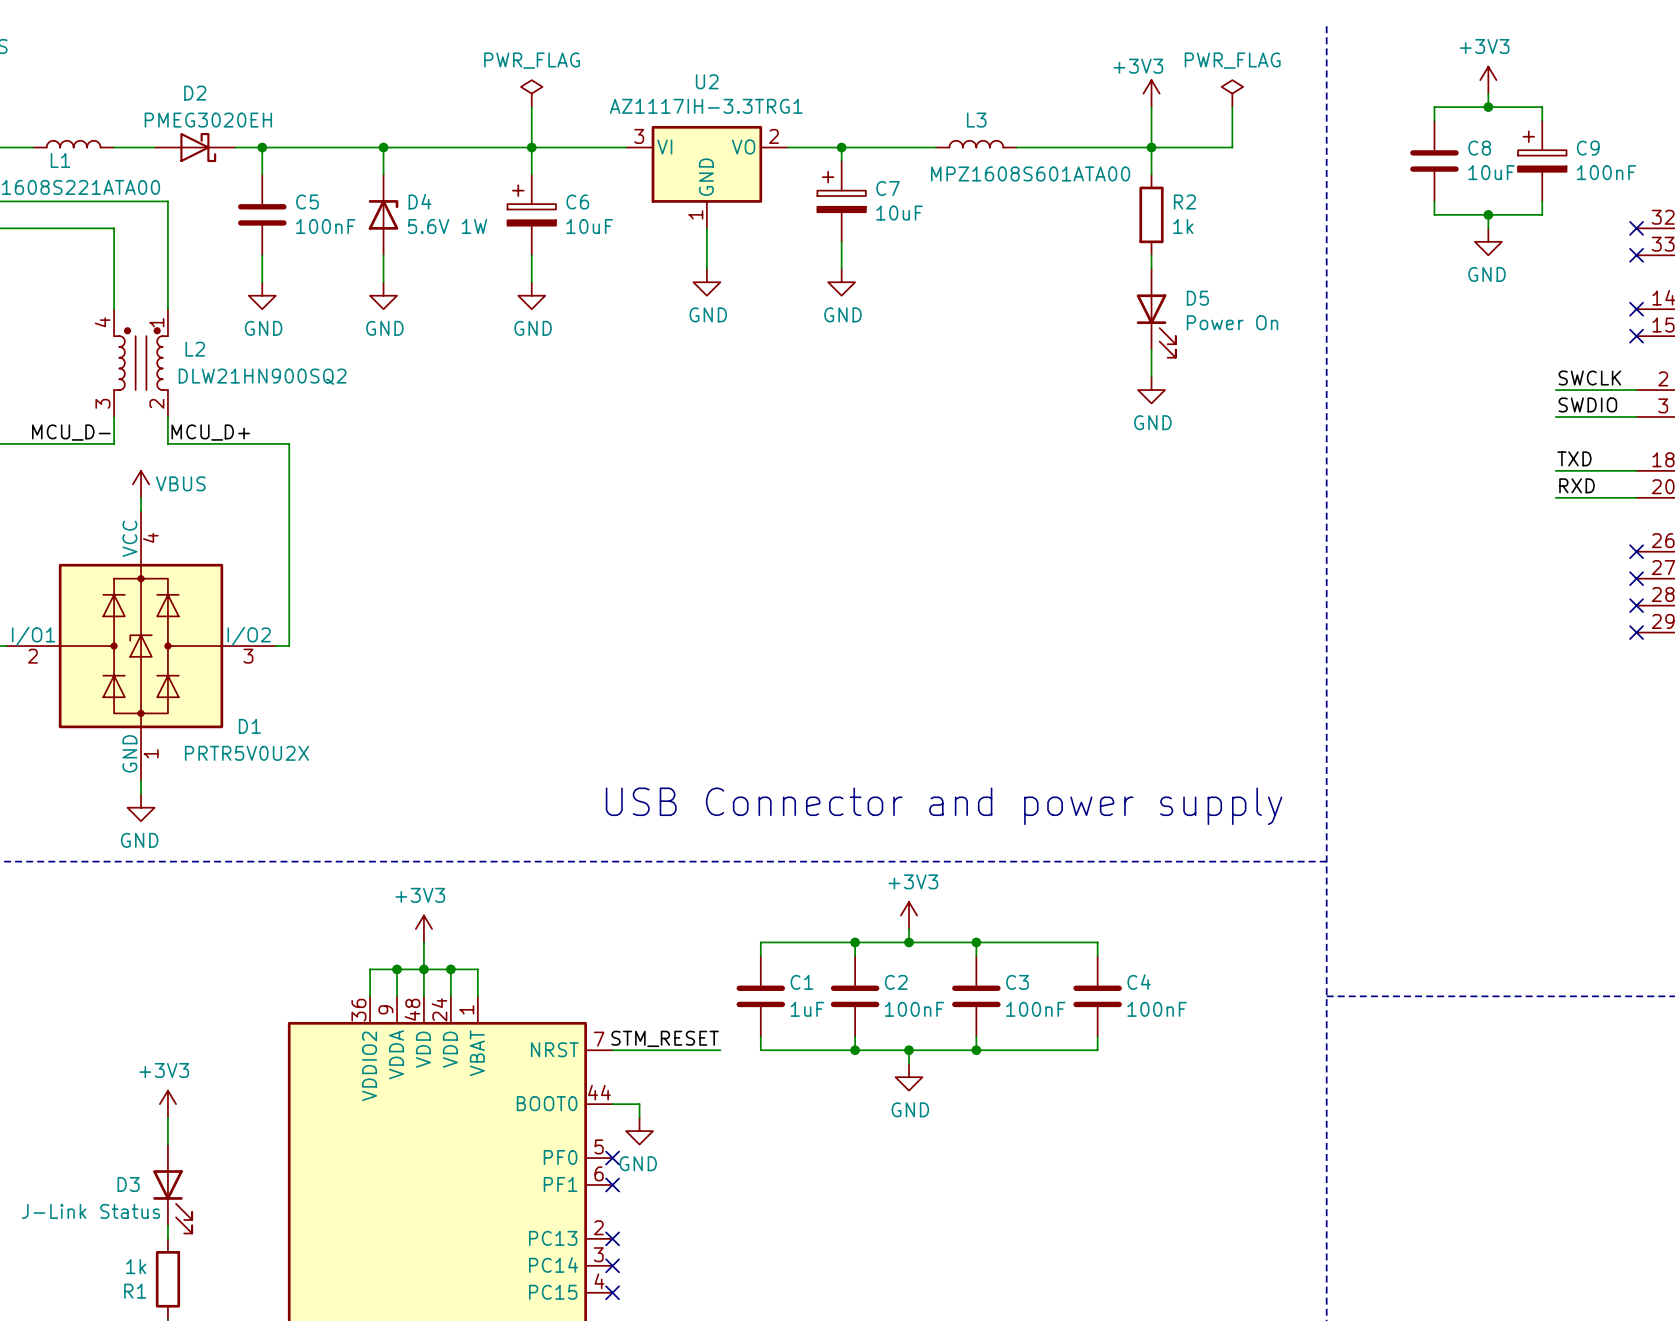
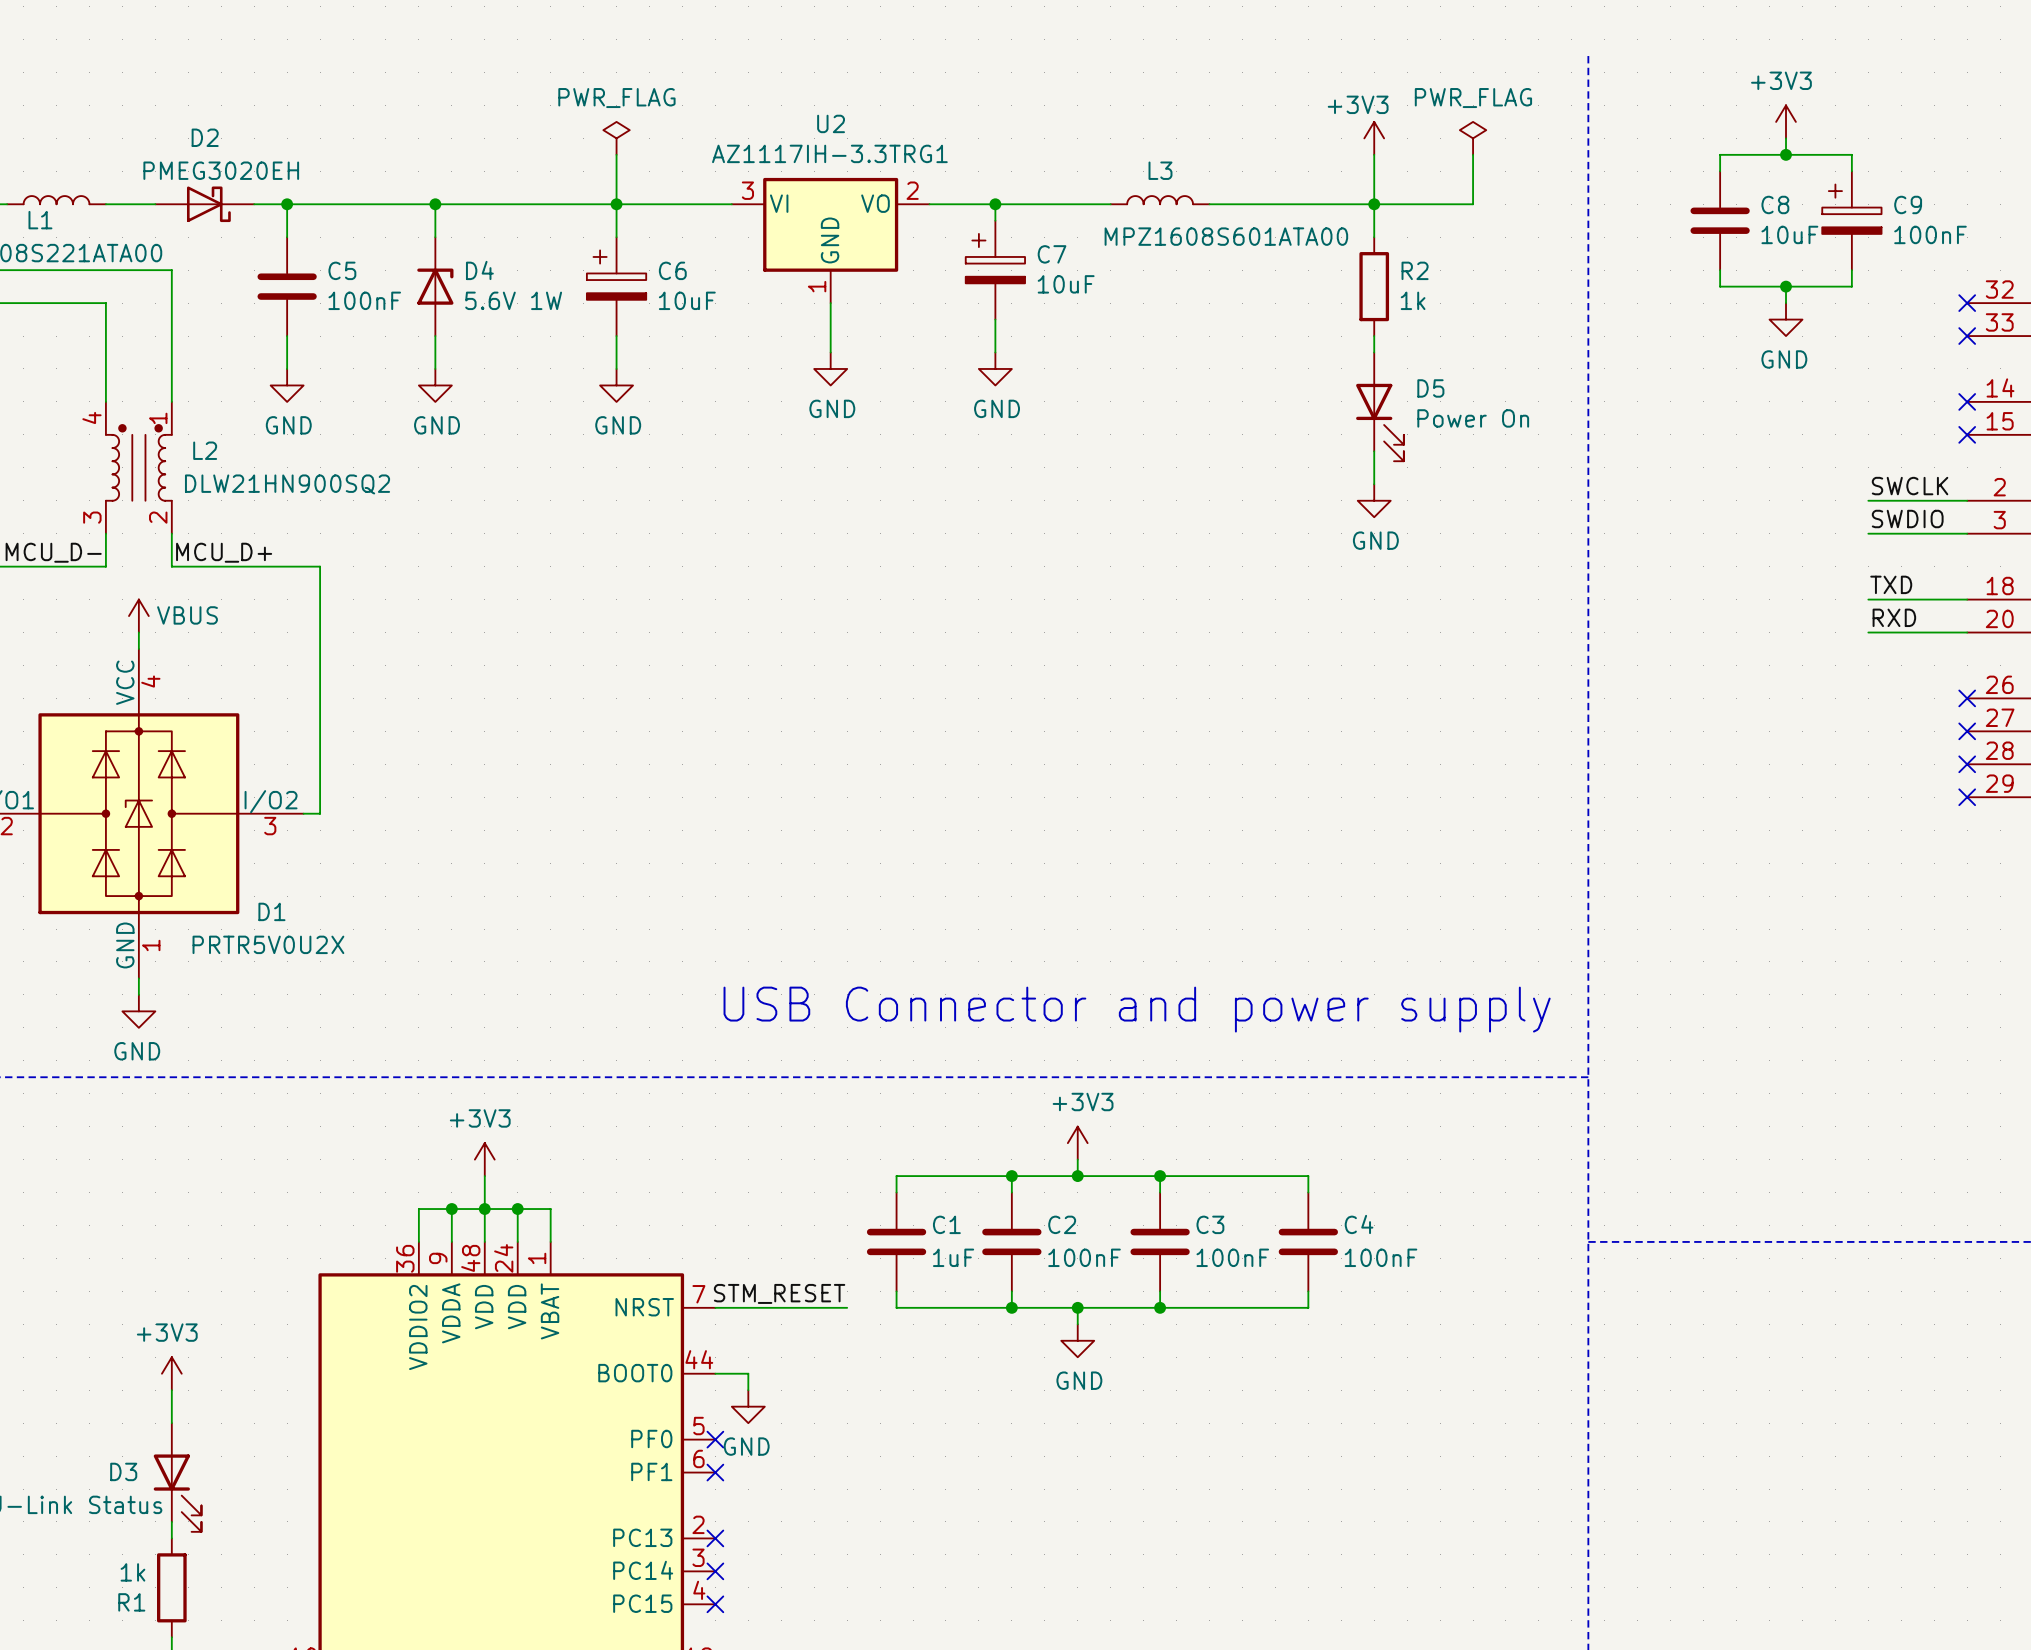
text position: USB Connector and power supply (944, 806) -> USB Connector and power supply (1137, 1009)

